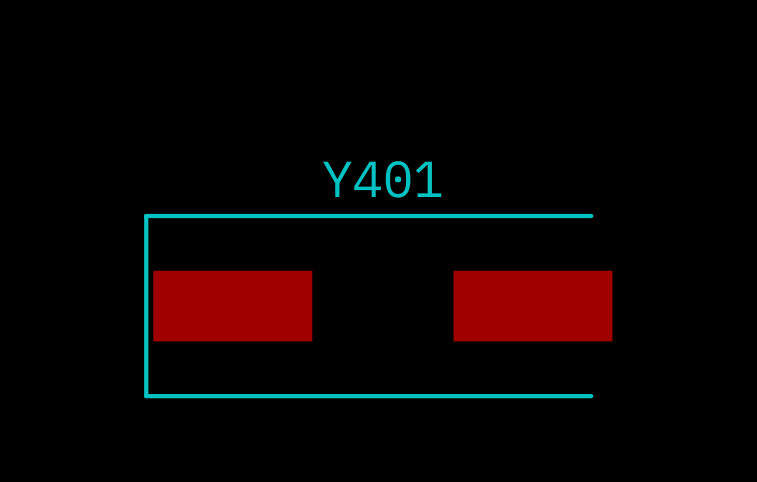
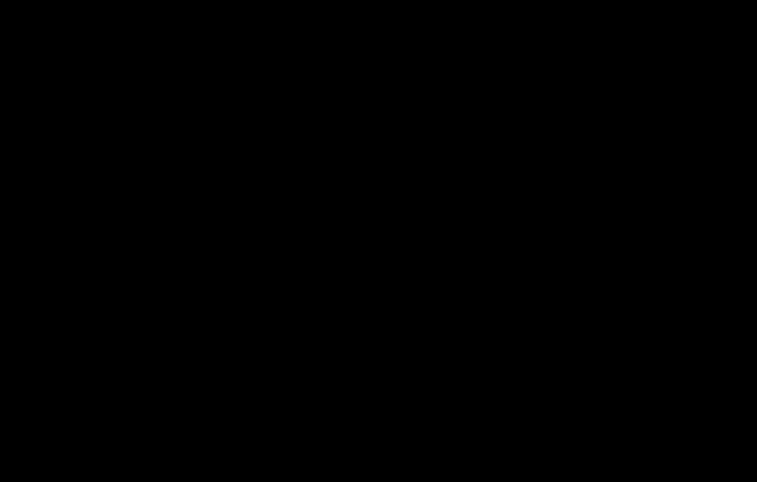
Y401: (378, 306) -> none

